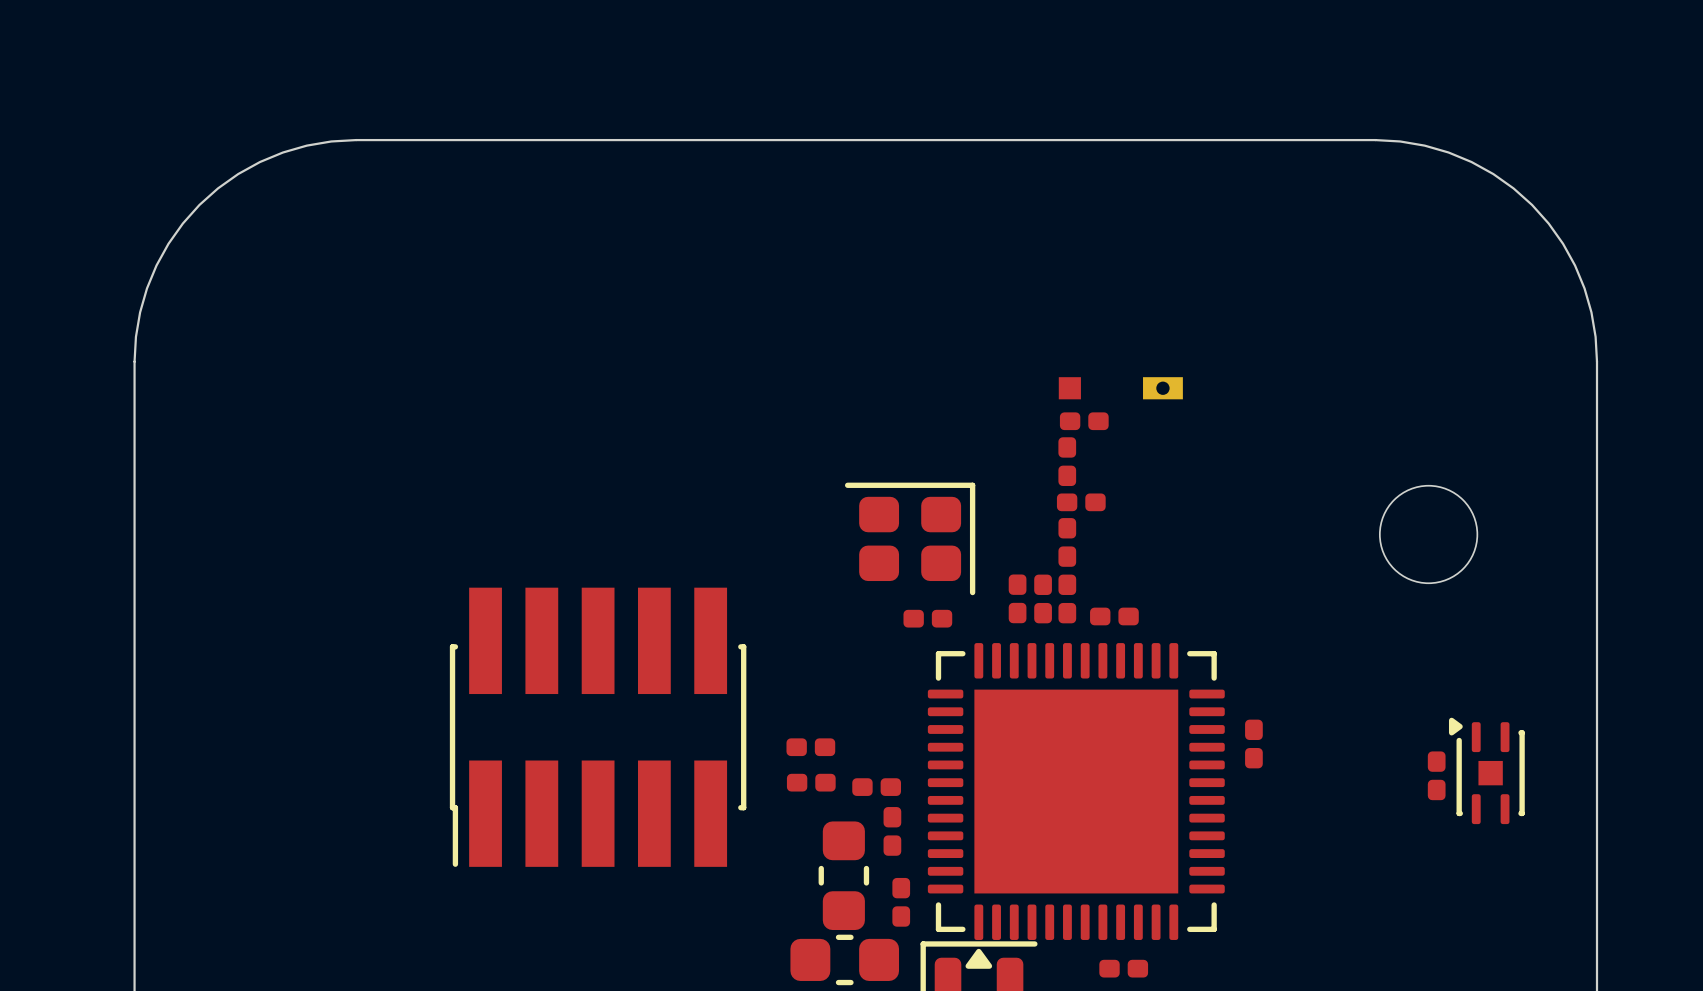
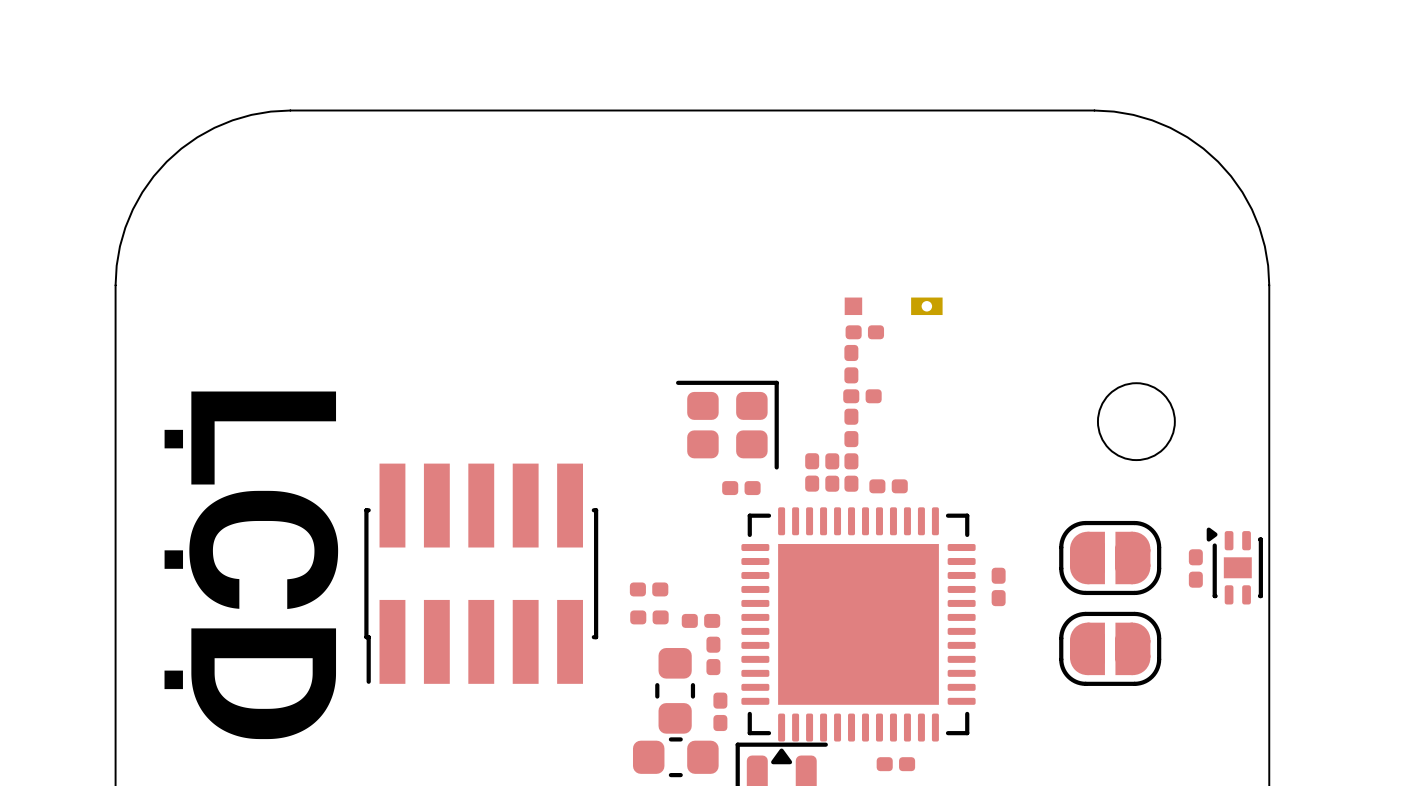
drawing: none -> [164, 391, 339, 740]
part: none -> (1110, 557)
part: none -> (1234, 566)
part: (1486, 770) -> none
part position: (1436, 775) -> (1195, 568)
part: none -> (1110, 648)

